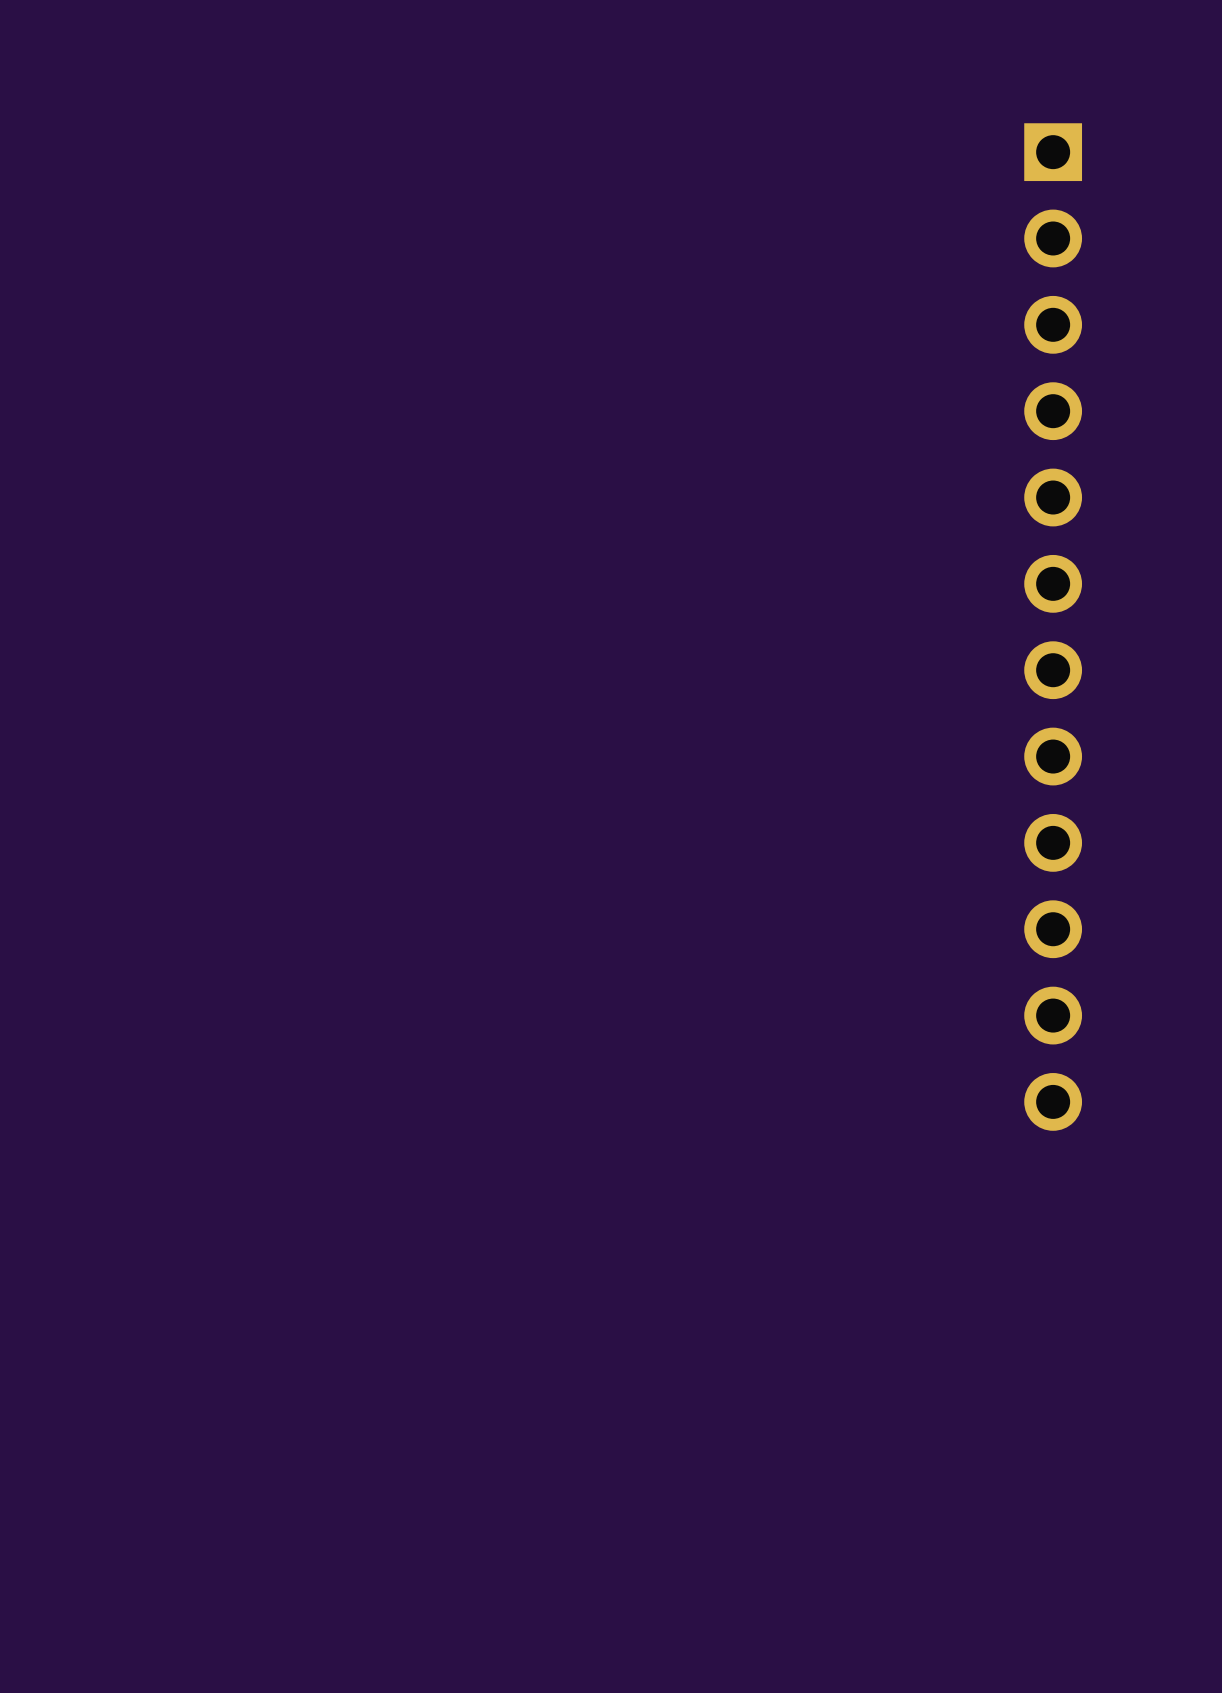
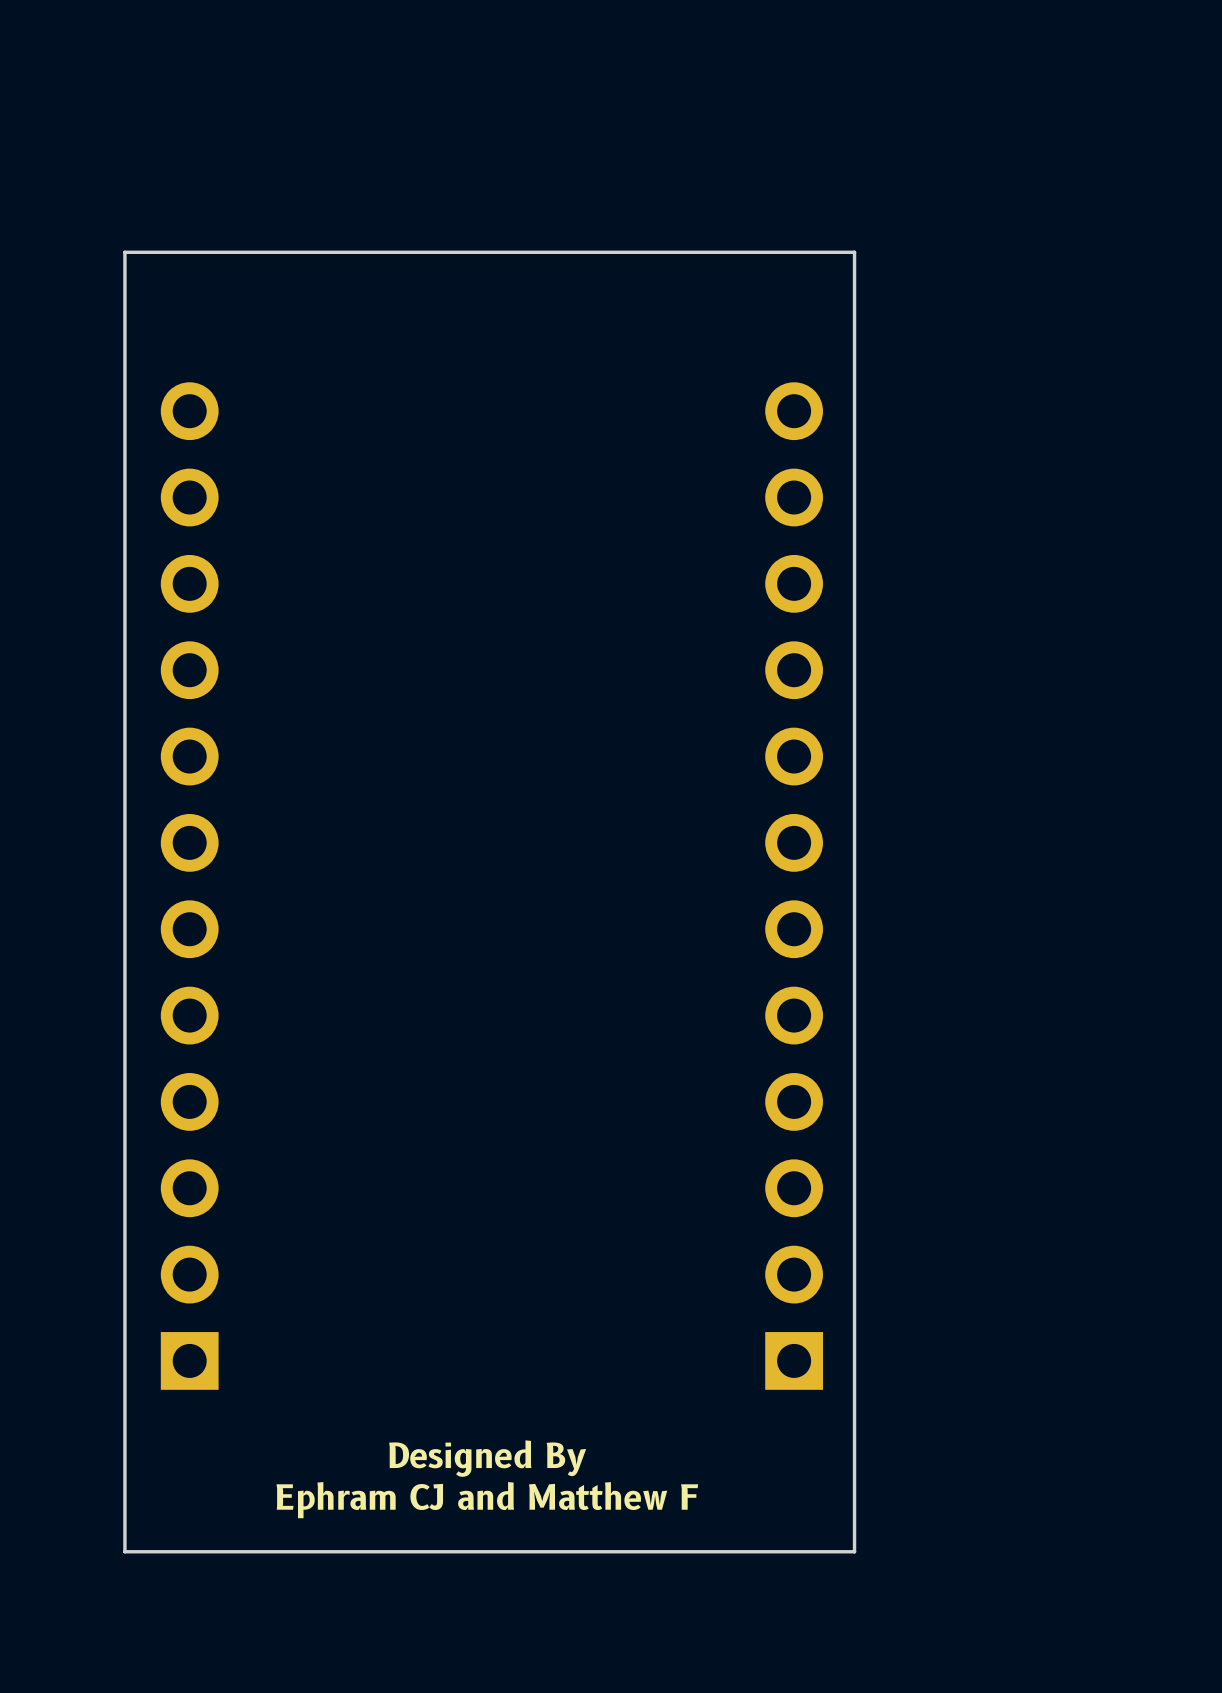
board edge: none -> (854, 252) (124, 252) (124, 1551) (854, 1551) (854, 252)
part rotation: 0° (1053, 627) -> 180° (794, 886)
part: none -> (189, 886)
text: none -> Designed By (487, 1458)
text: none -> Ephram CJ and Matthew F (487, 1500)

